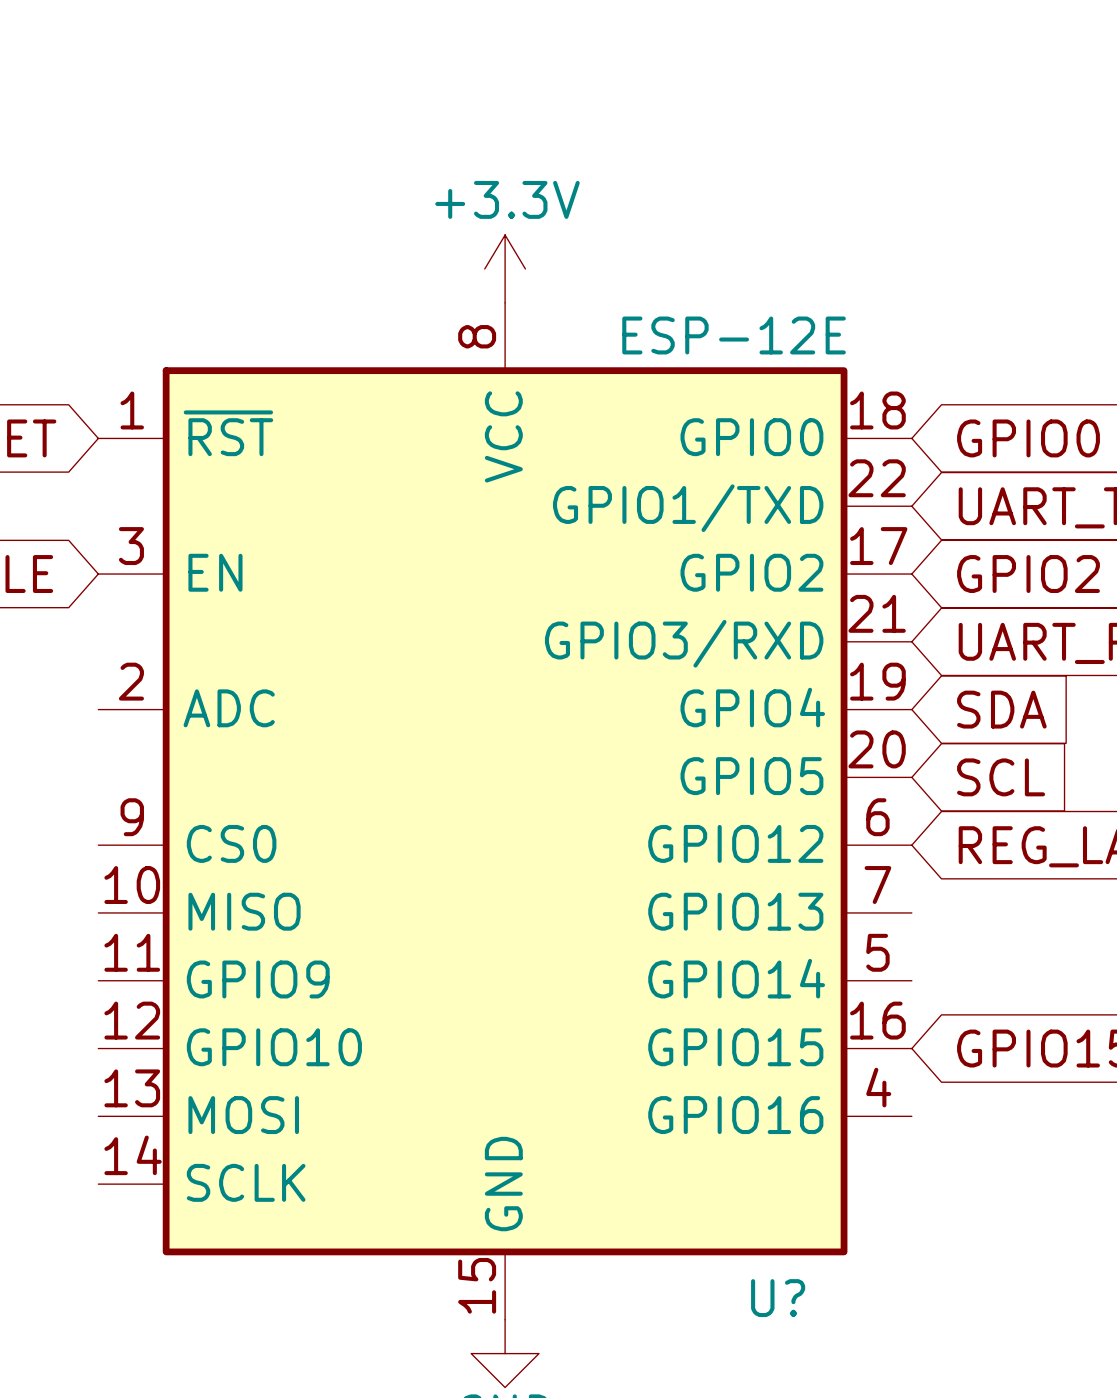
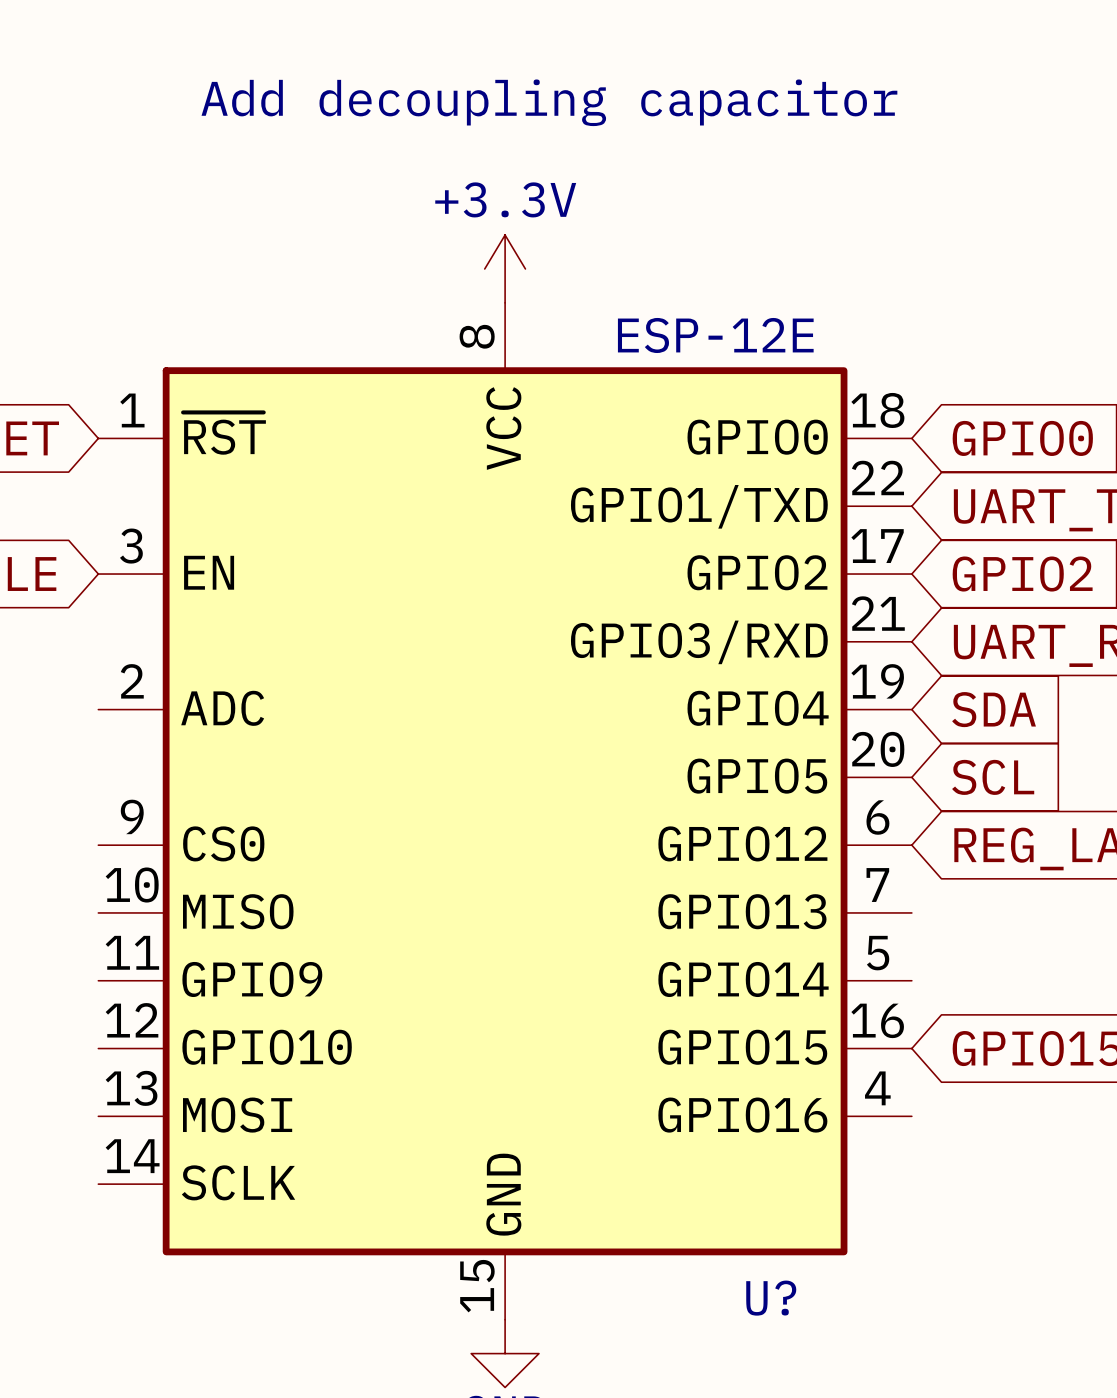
text: none -> Add decoupling capacitor (549, 102)

